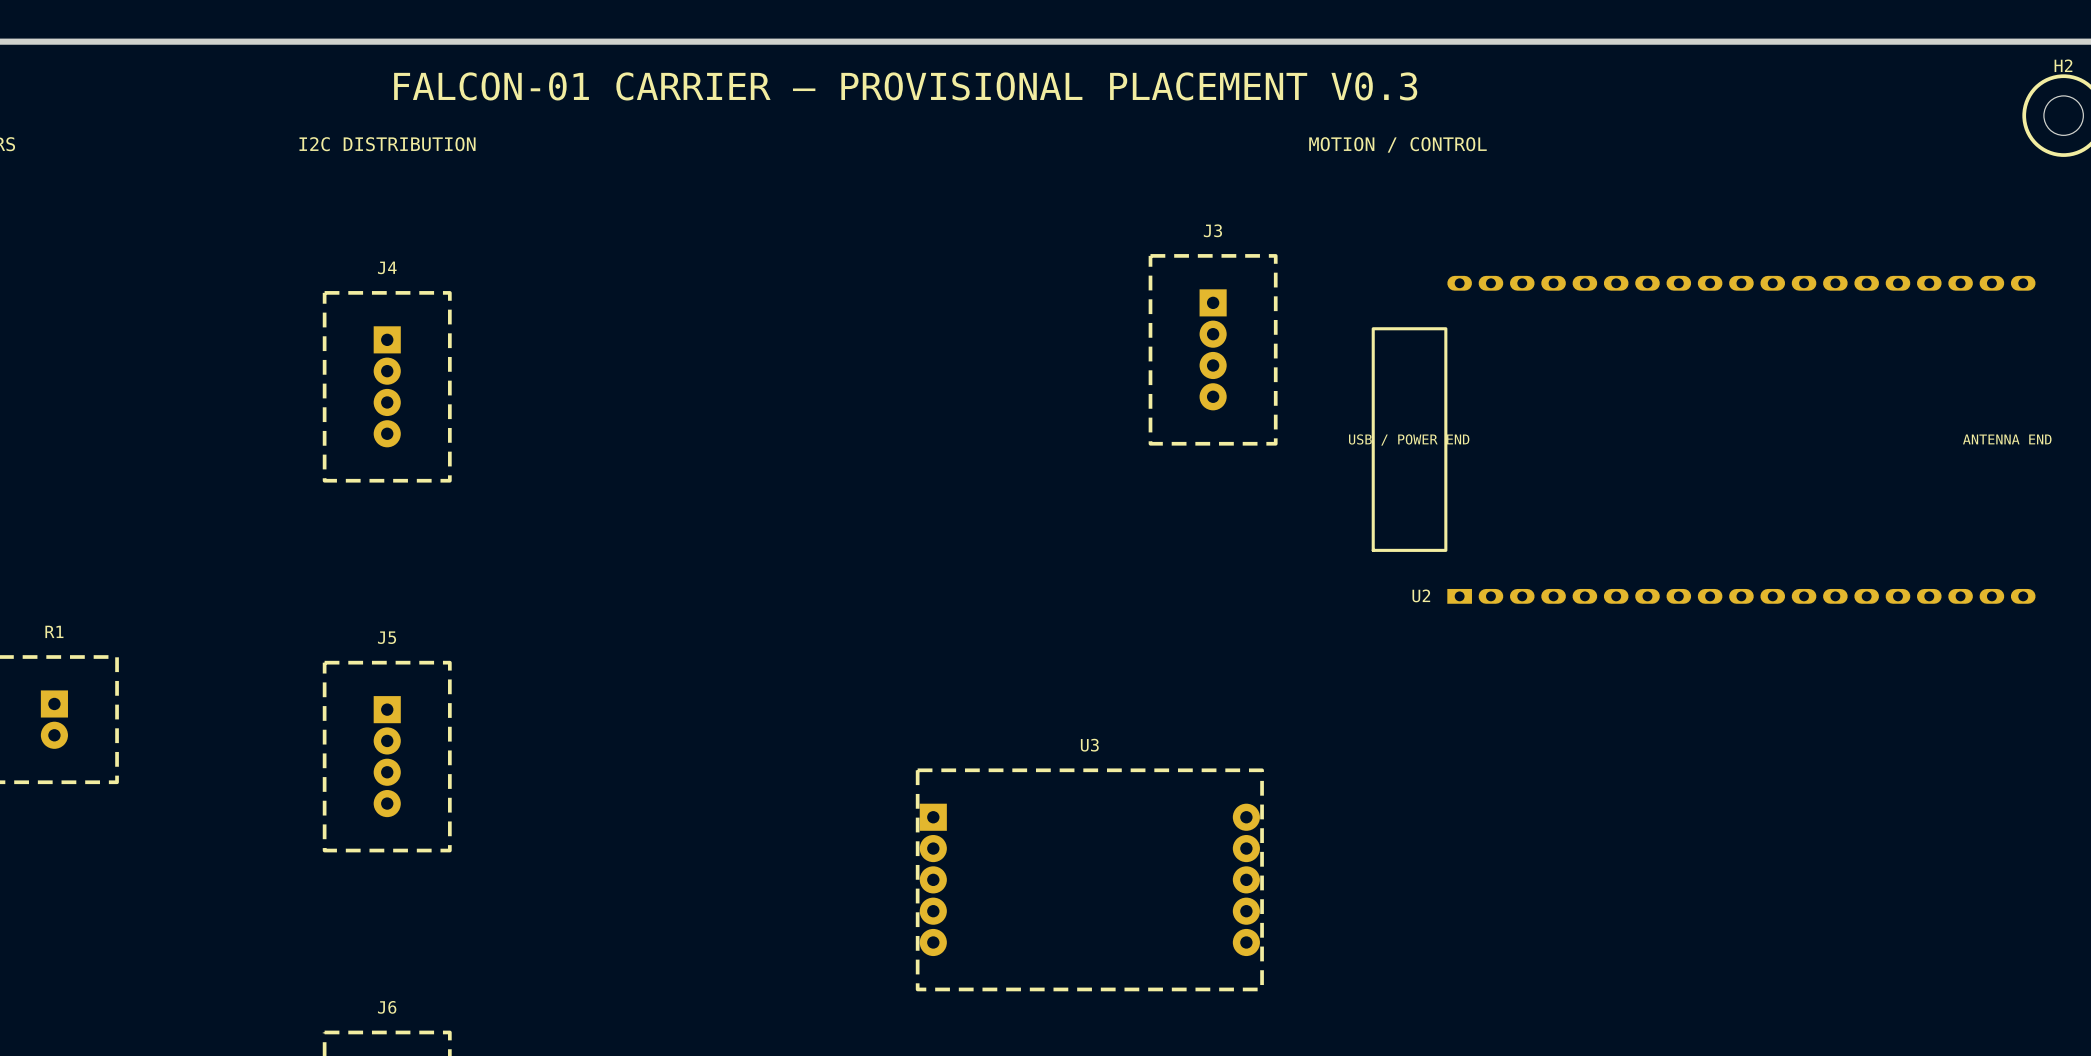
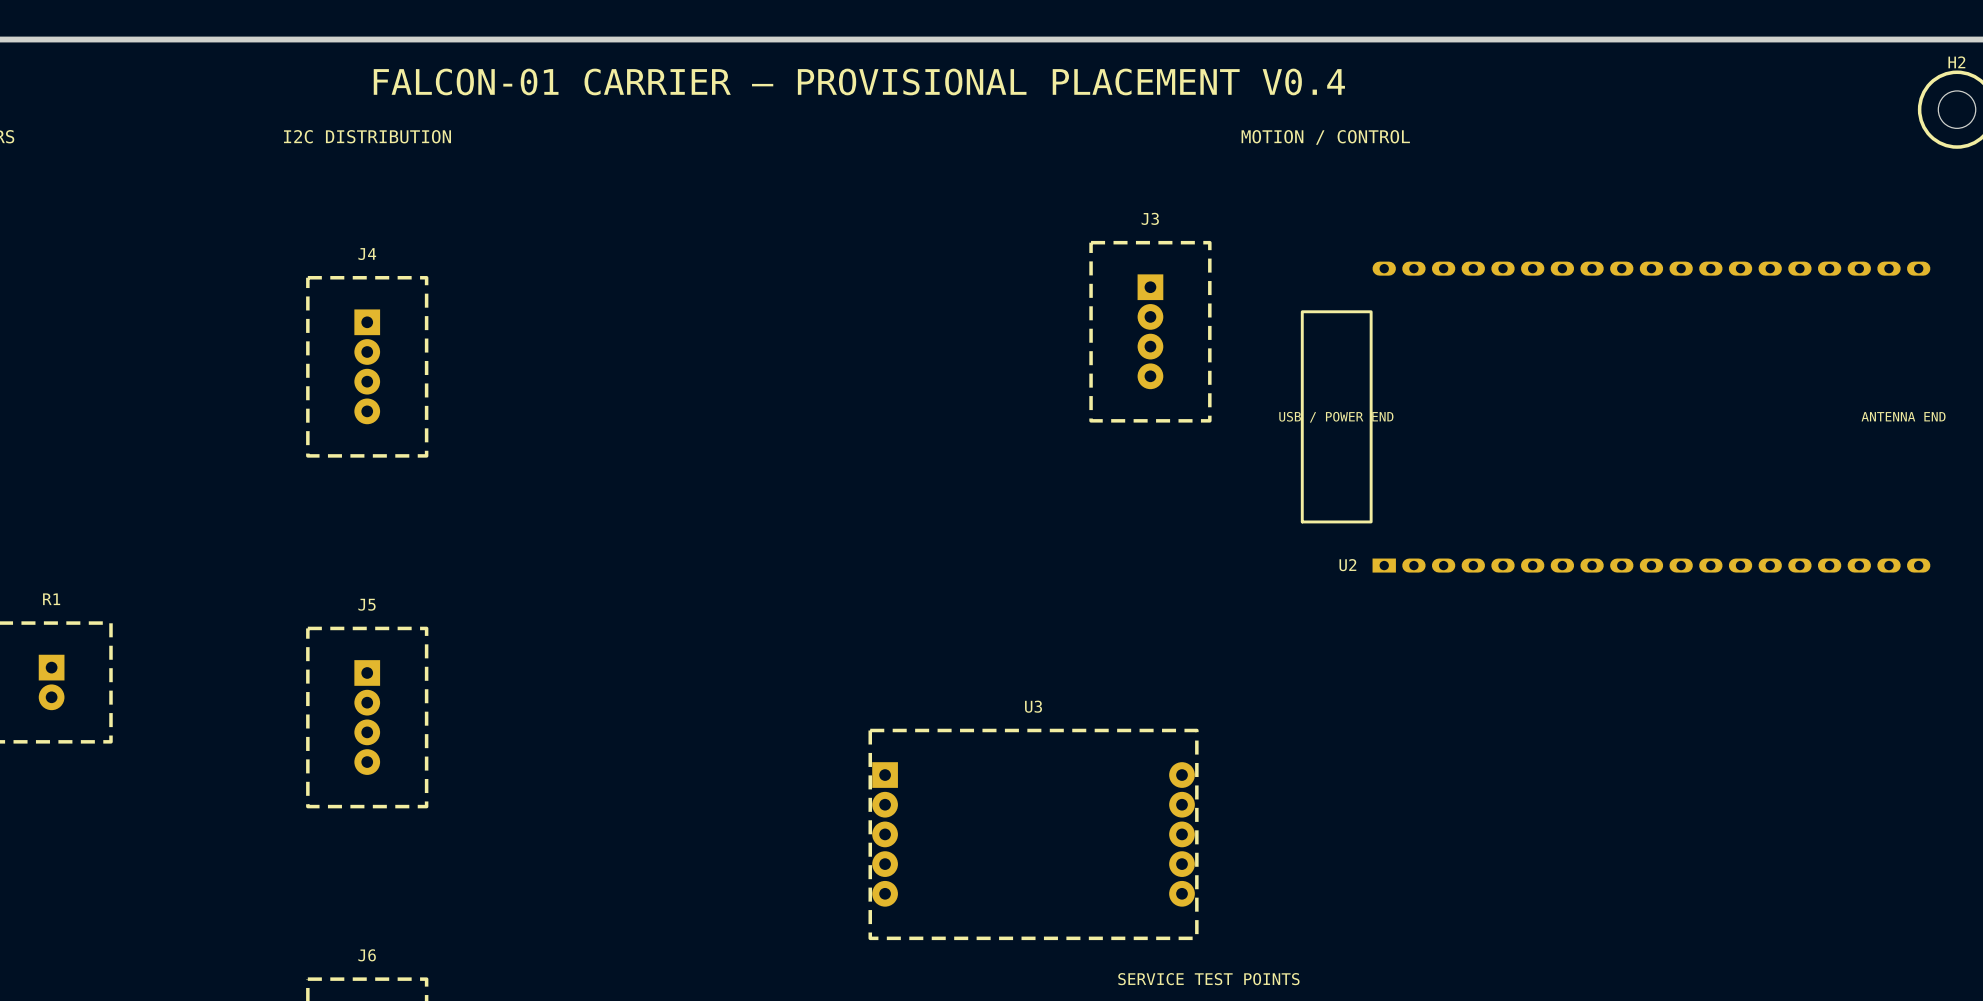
text: FALCON-01 CARRIER — PROVISIONAL PLACEMENT V0.3 (905, 86) -> FALCON-01 CARRIER — PROVISIONAL PLACEMENT V0.4 (859, 81)
text: none -> SERVICE TEST POINTS (1208, 979)

